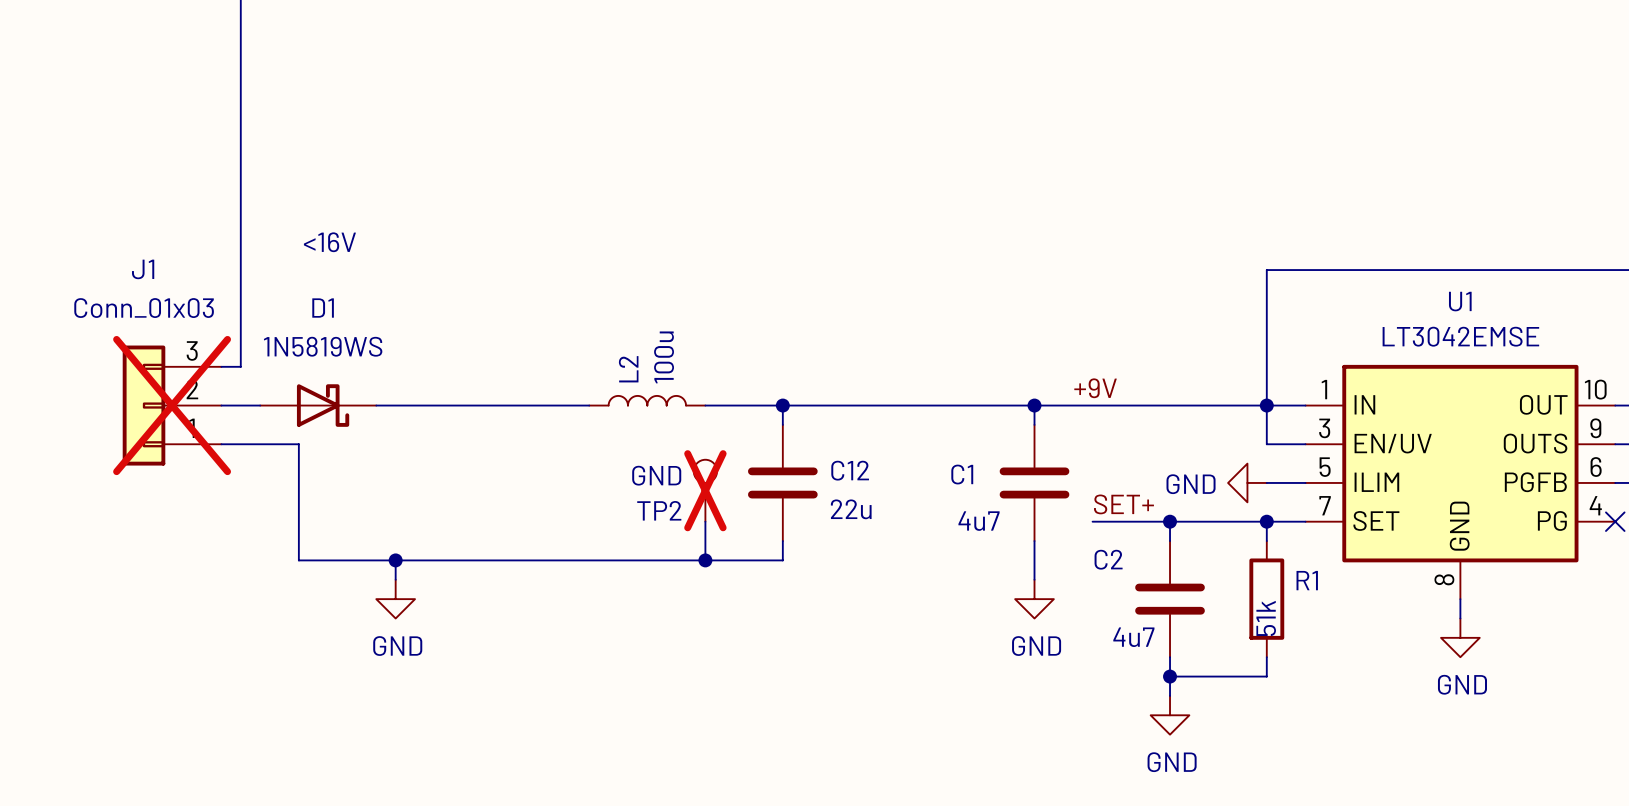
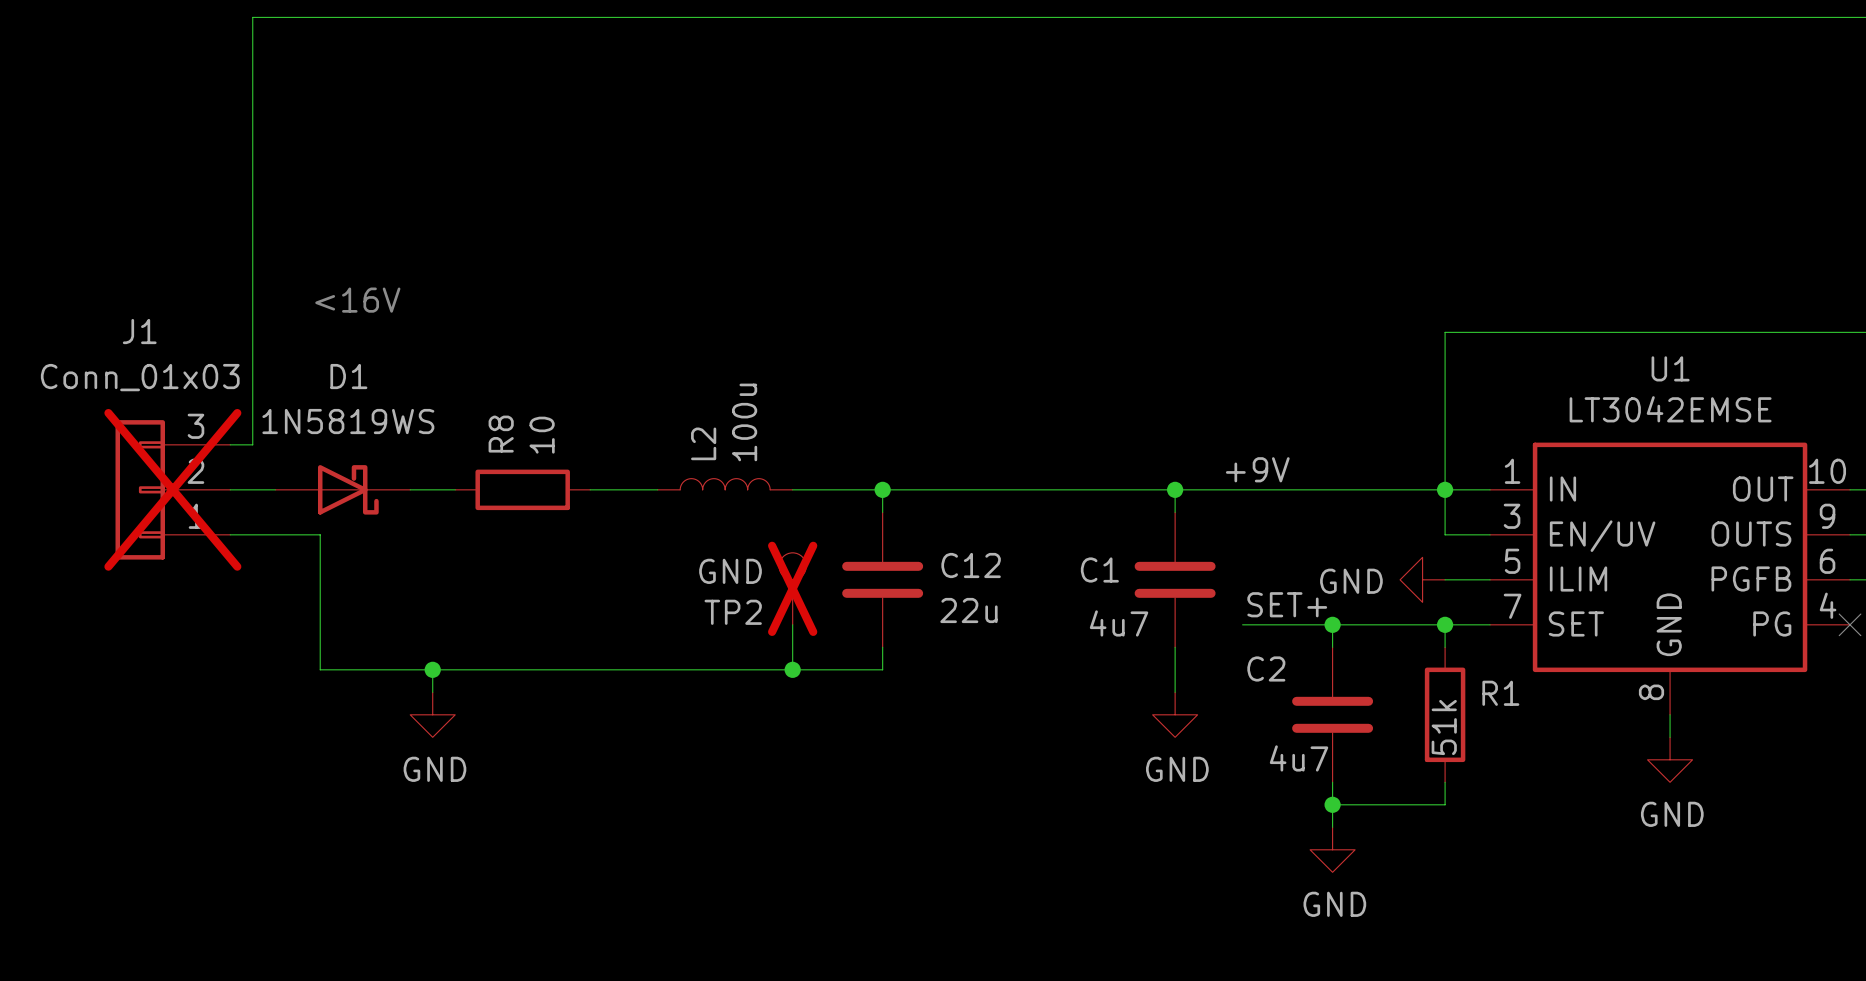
wire: (415, 405) (531, 405) -> none
R8: none -> 10 (522, 489)

